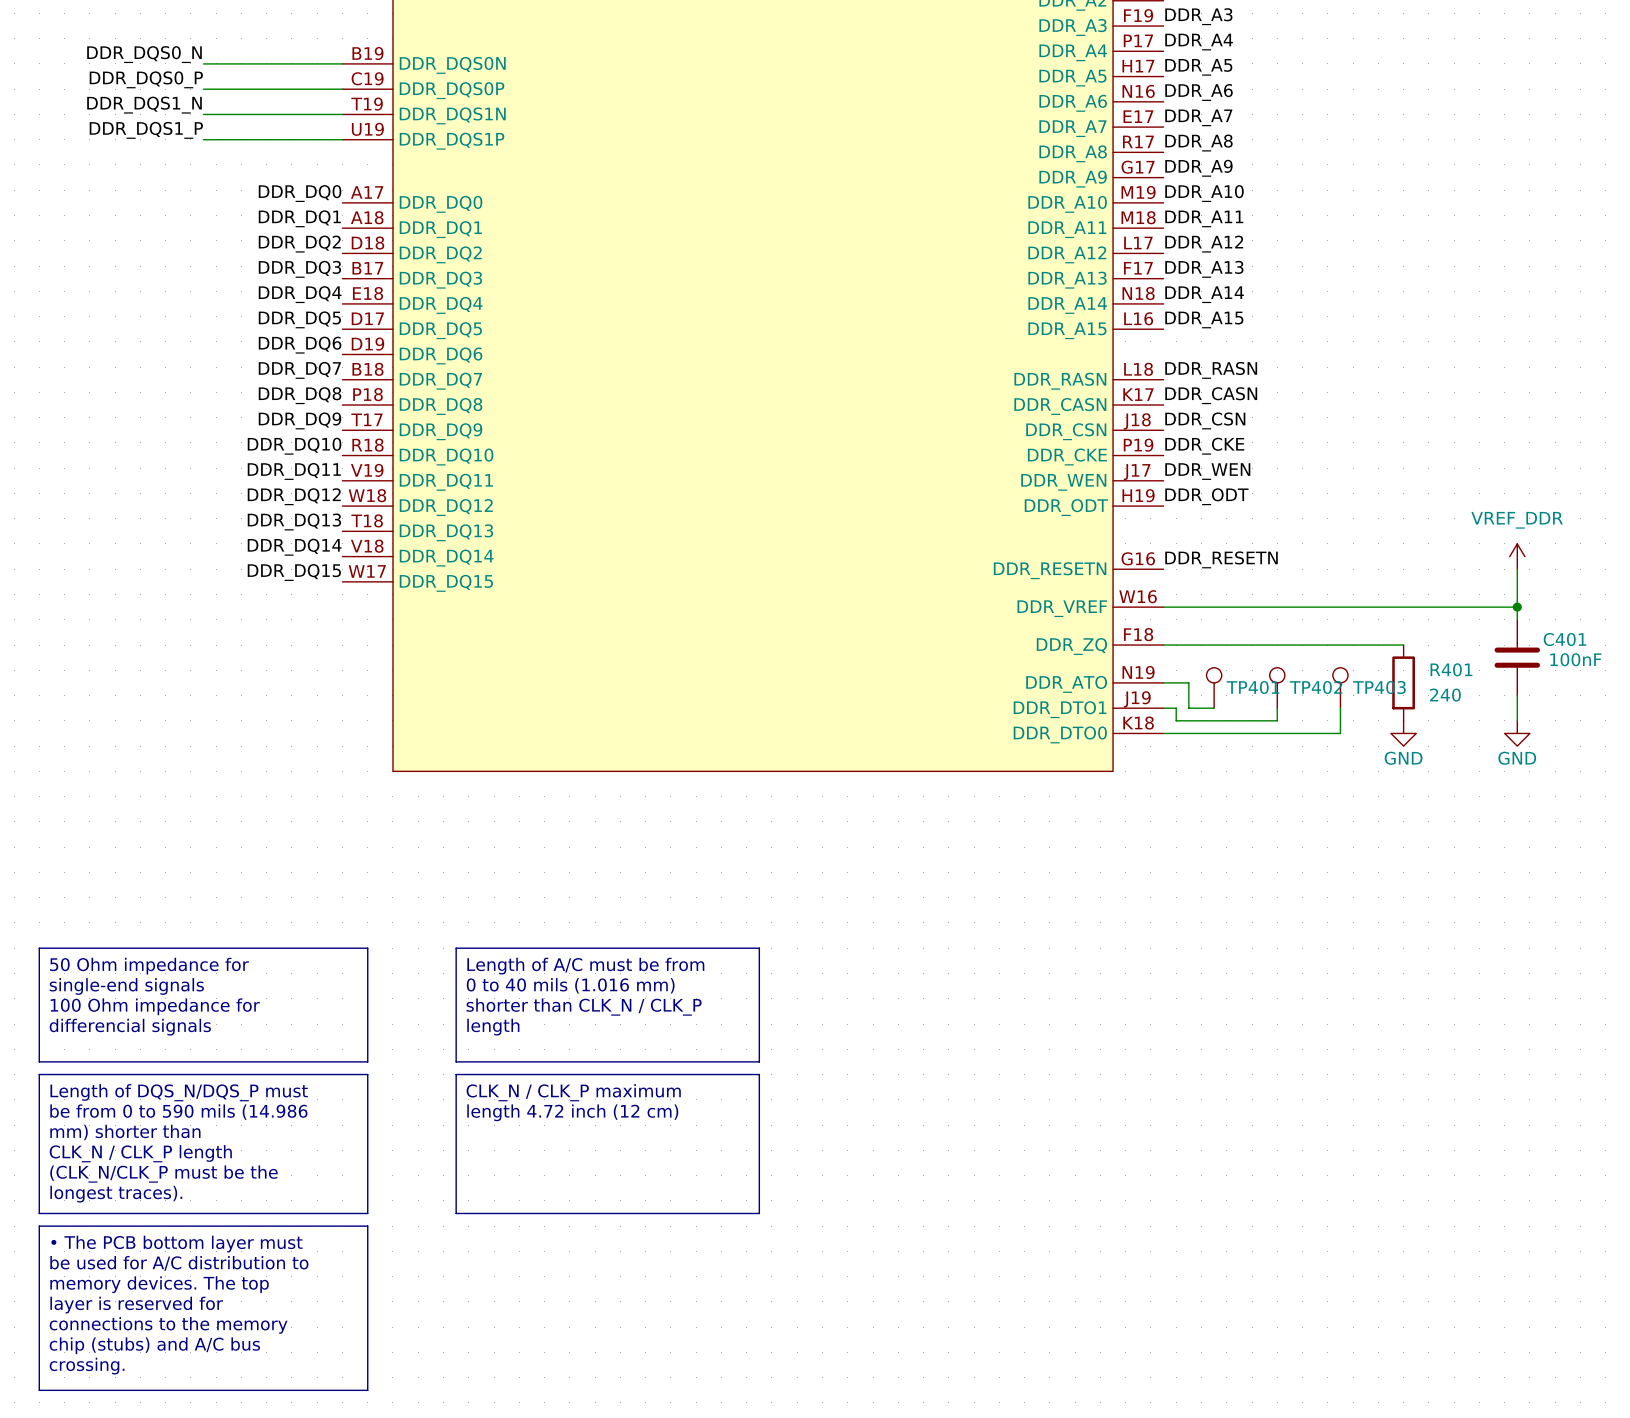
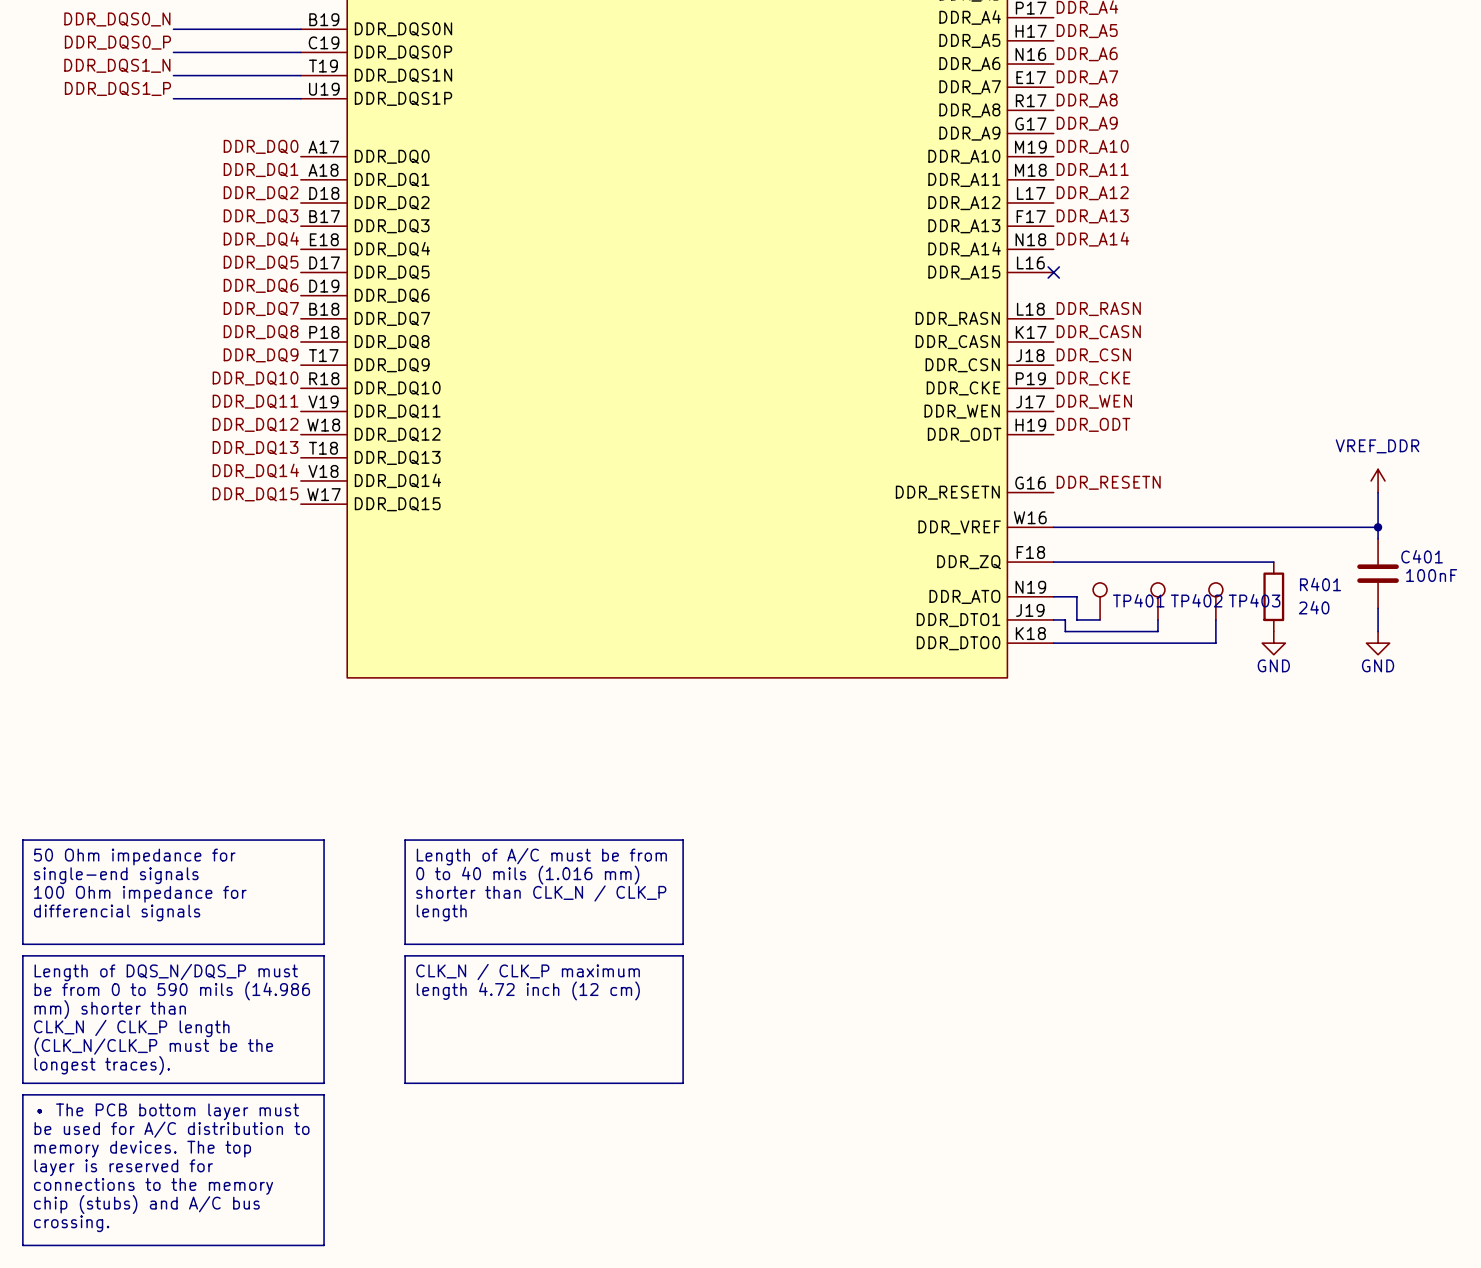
label: DDR_A15 (1204, 319) -> none
no-connect mark: none -> (1053, 272)

